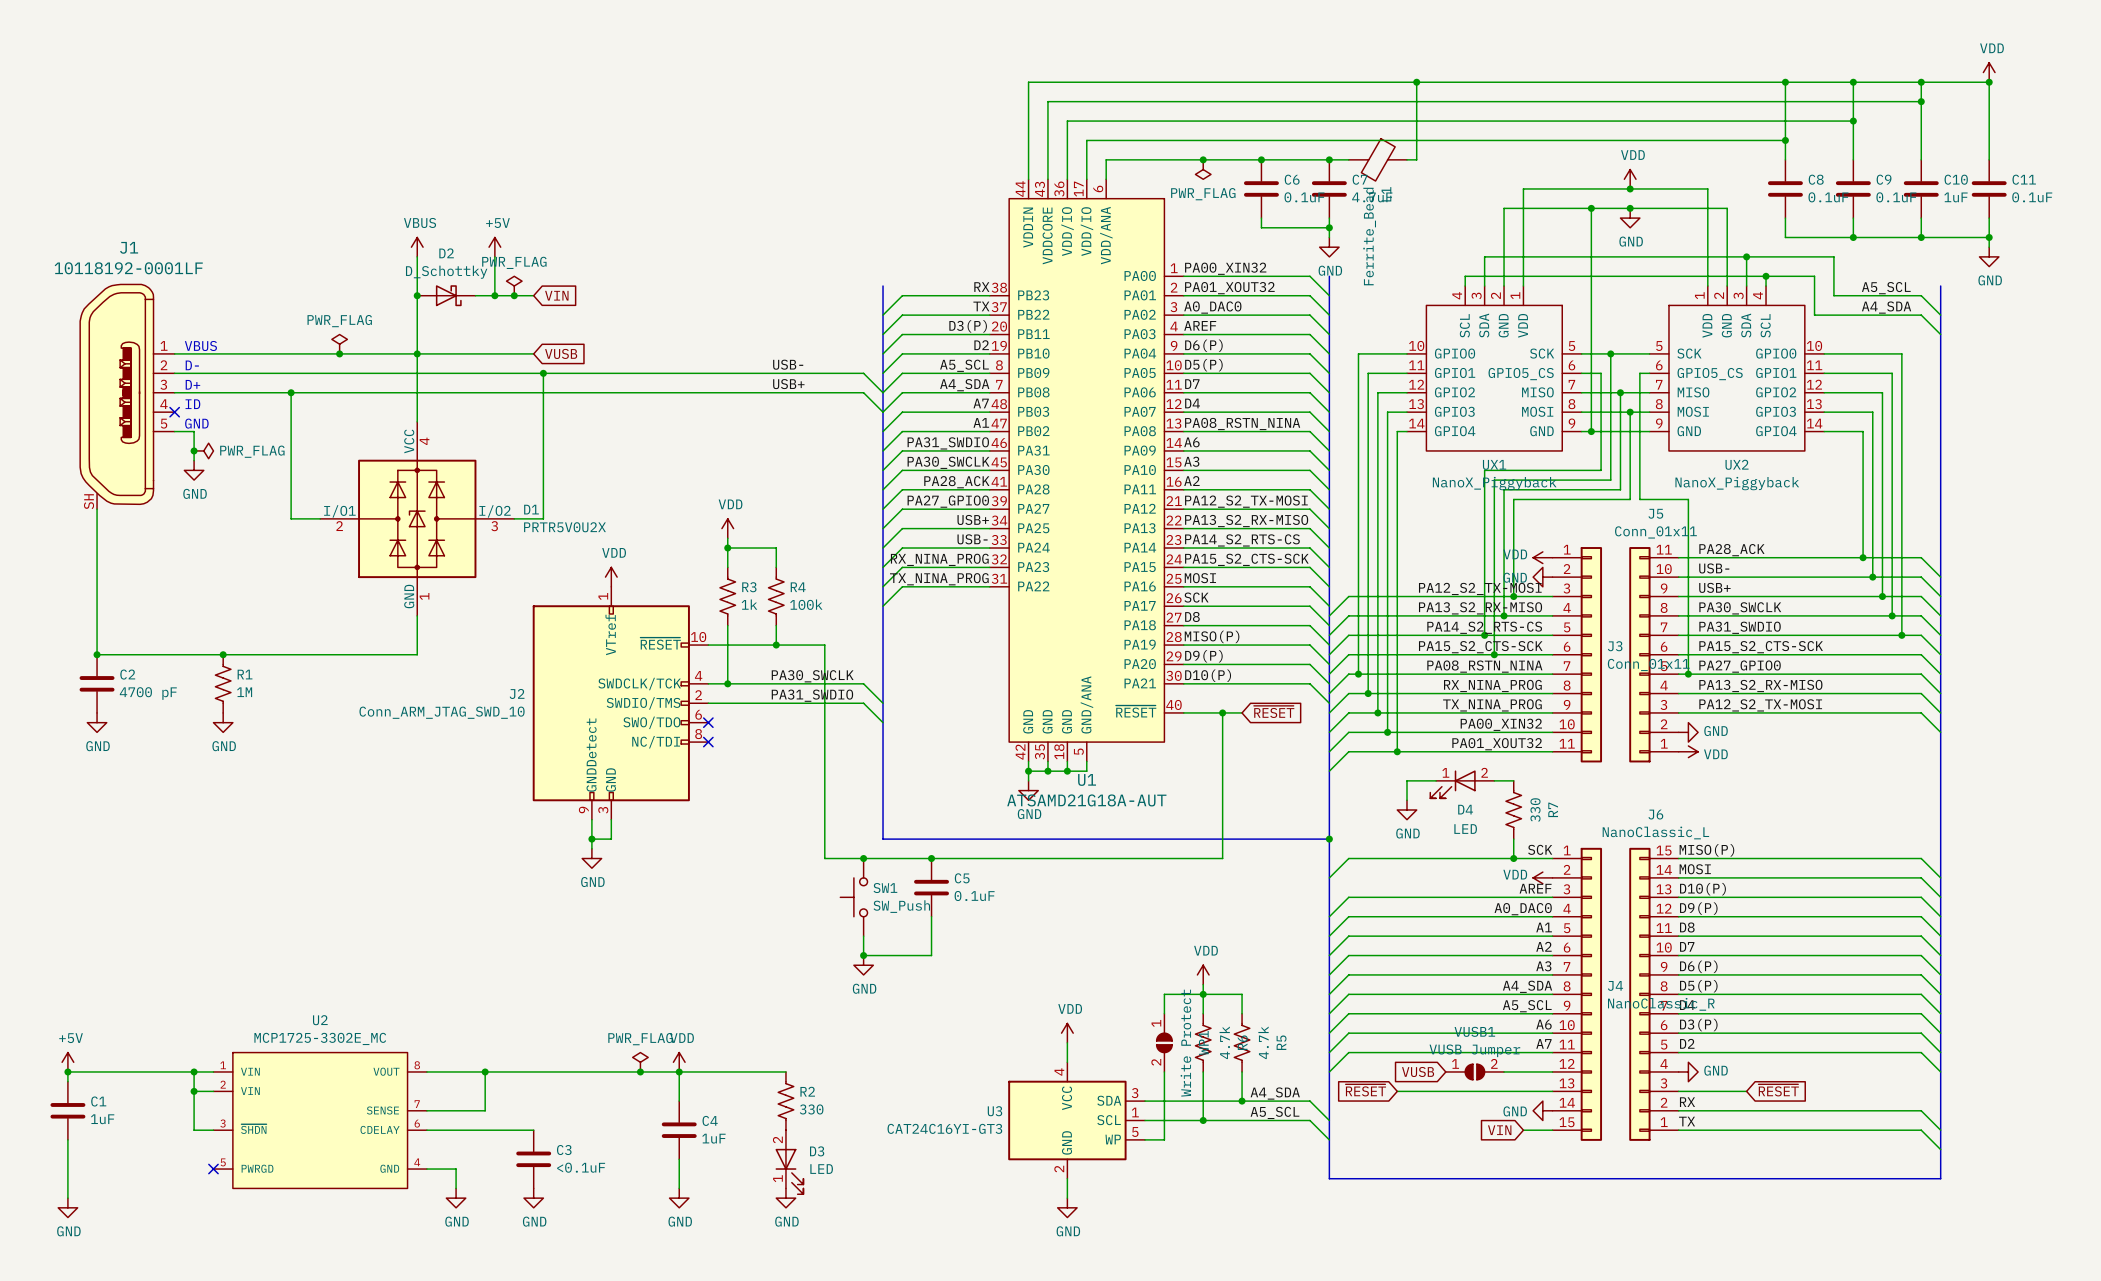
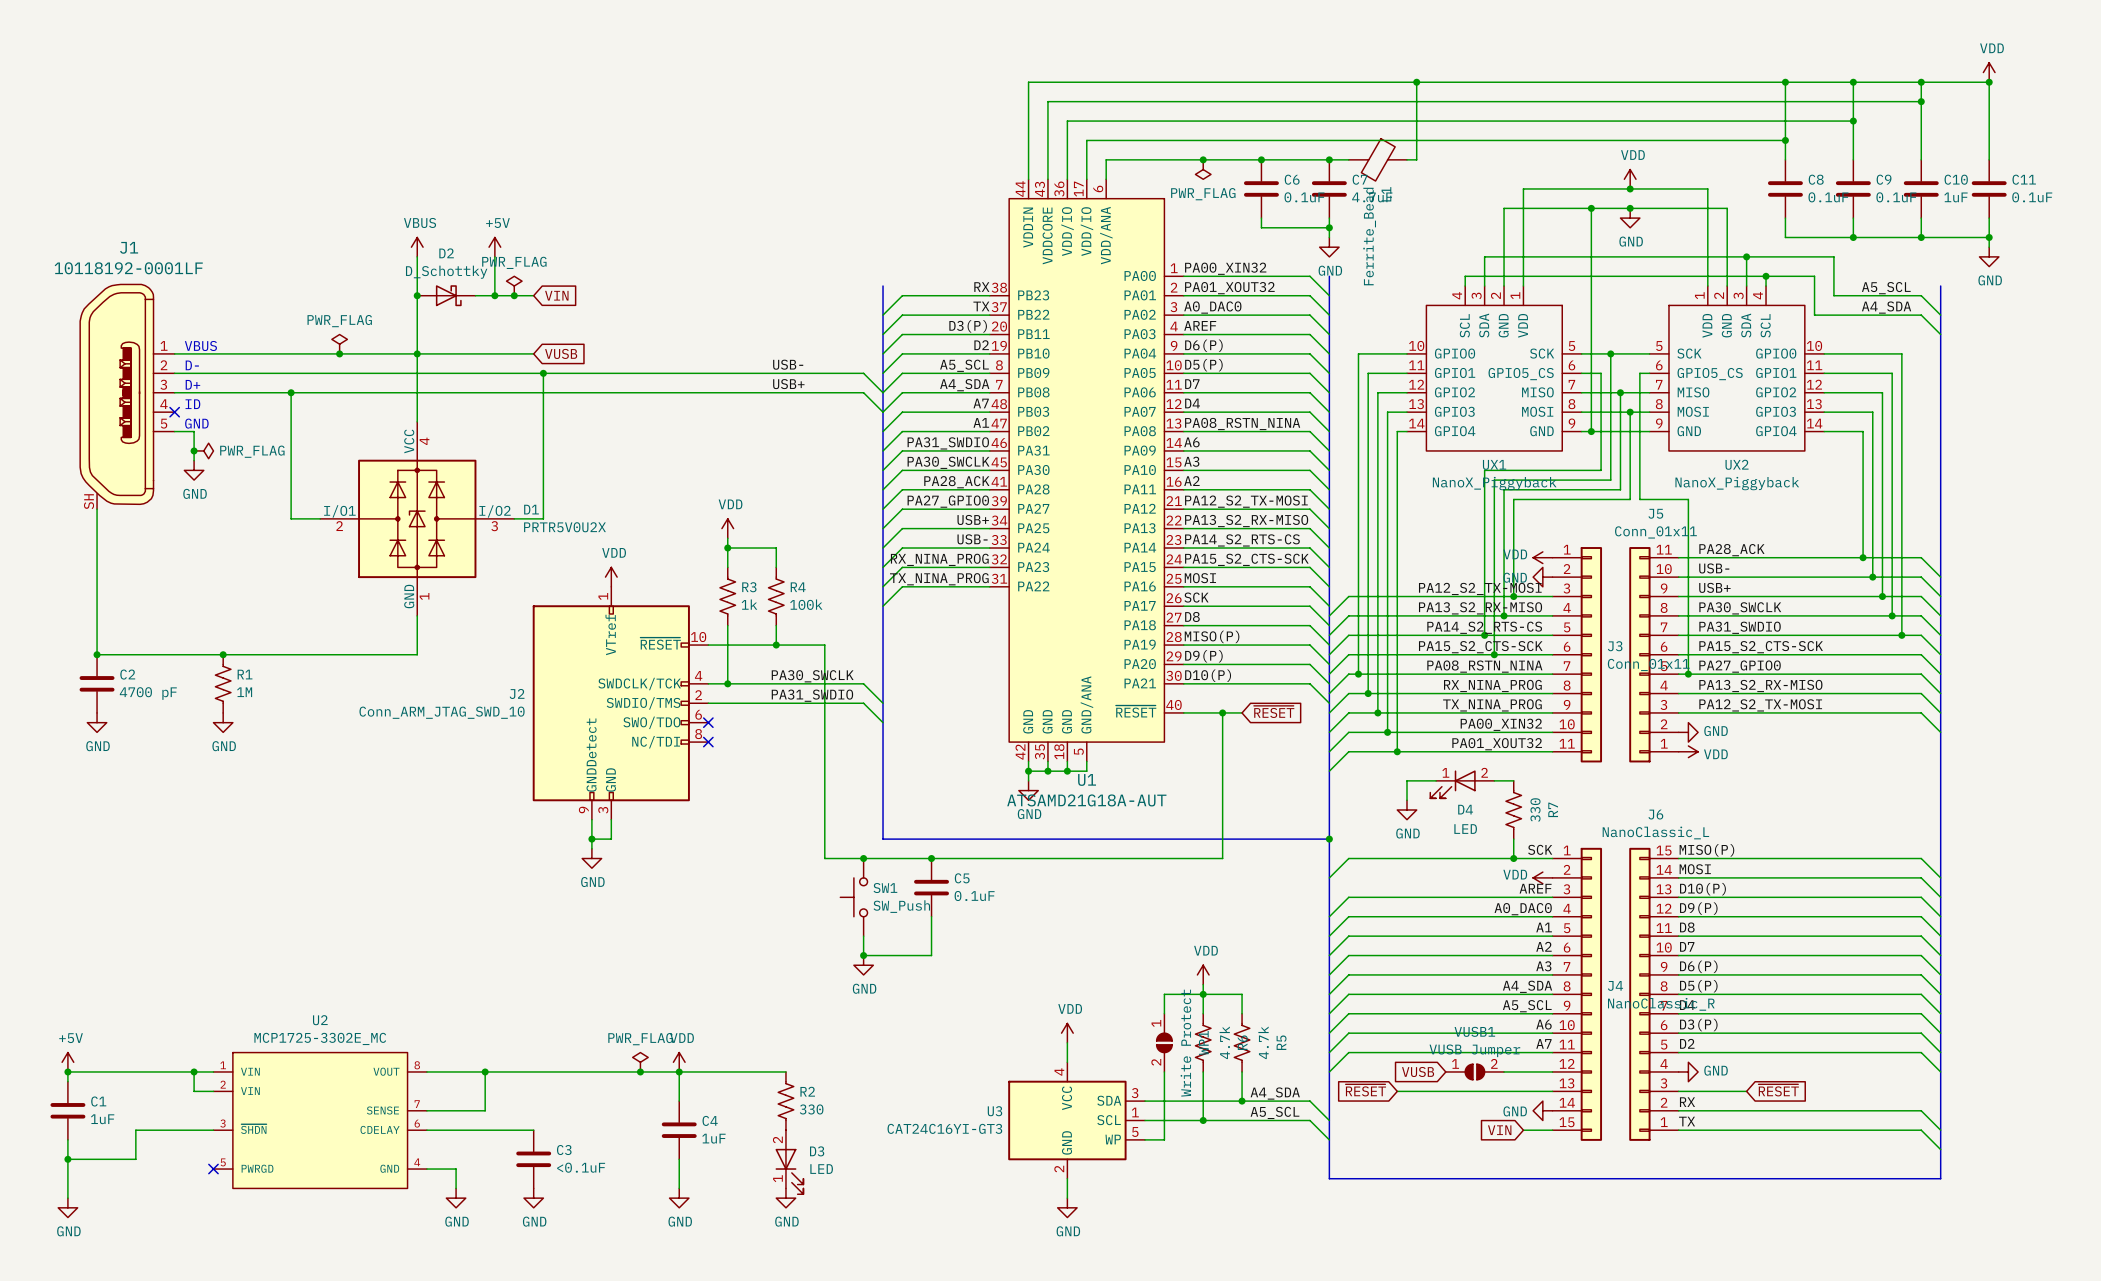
wire: (194, 1091) (194, 1130) -> (67, 1159) (135, 1159) (135, 1130) (194, 1130)
junction: (194, 1091) -> none
junction: none -> (67, 1159)

